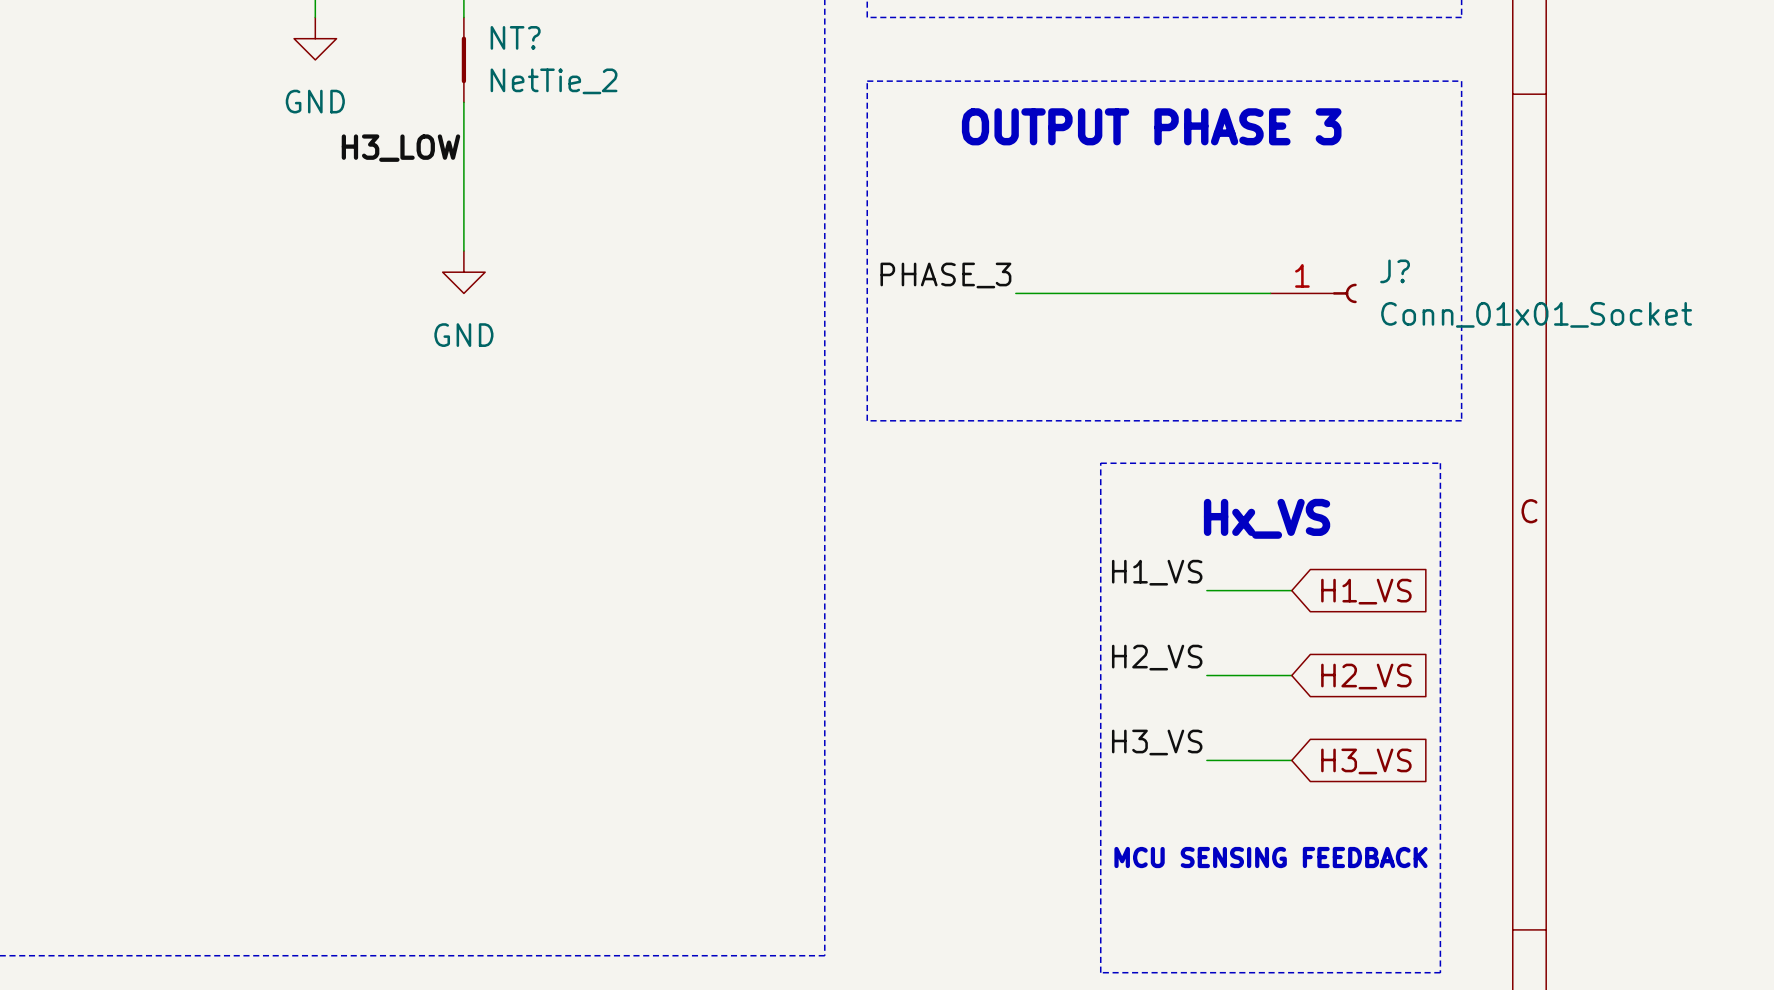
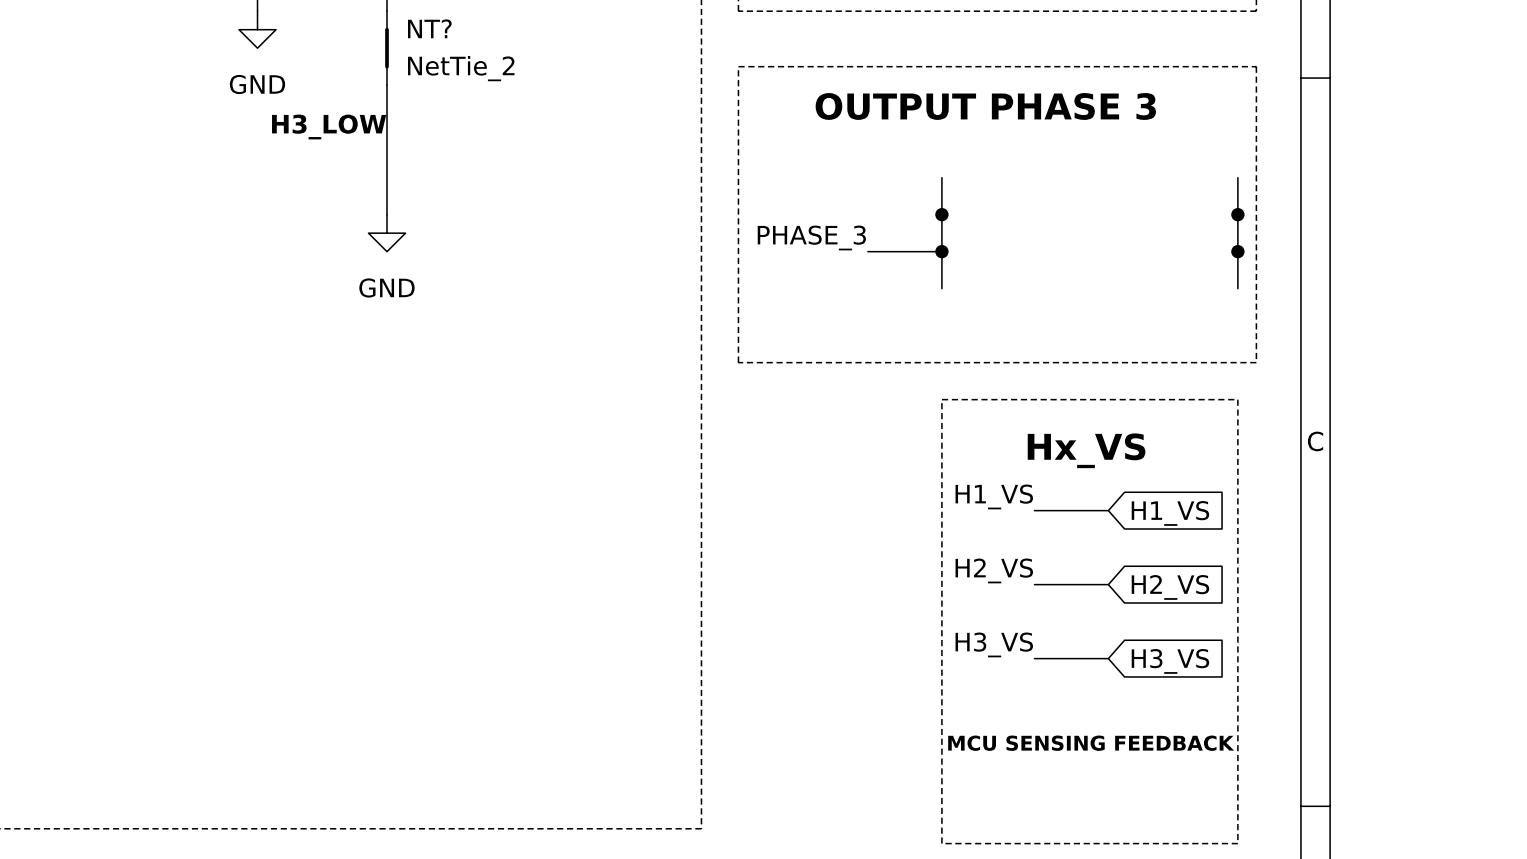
wire: none -> (941, 177) (941, 288)
wire: none -> (1237, 177) (1237, 288)
junction: none -> (941, 214)
junction: none -> (1237, 214)
wire: (1100, 293) (1270, 293) -> none
junction: none -> (941, 251)
J?: Conn_01x01_Socket (1313, 293) -> none
junction: none -> (1237, 251)

